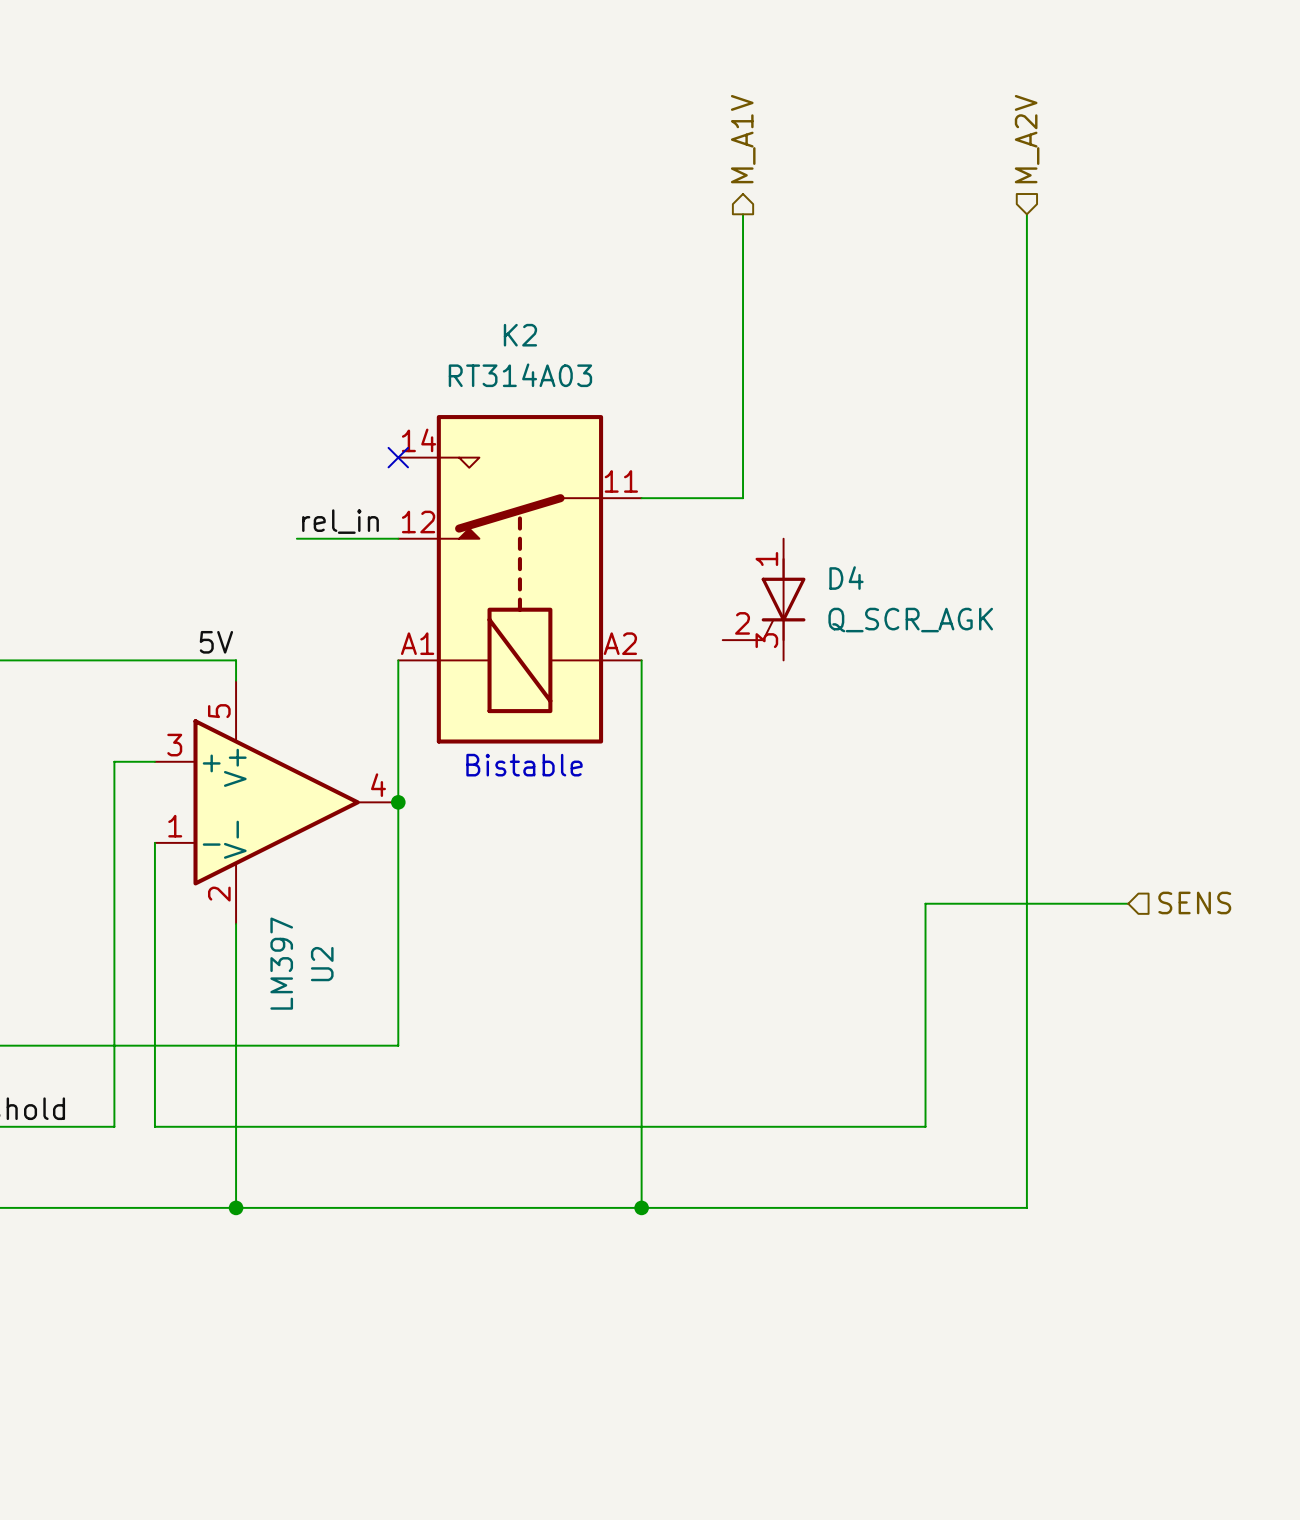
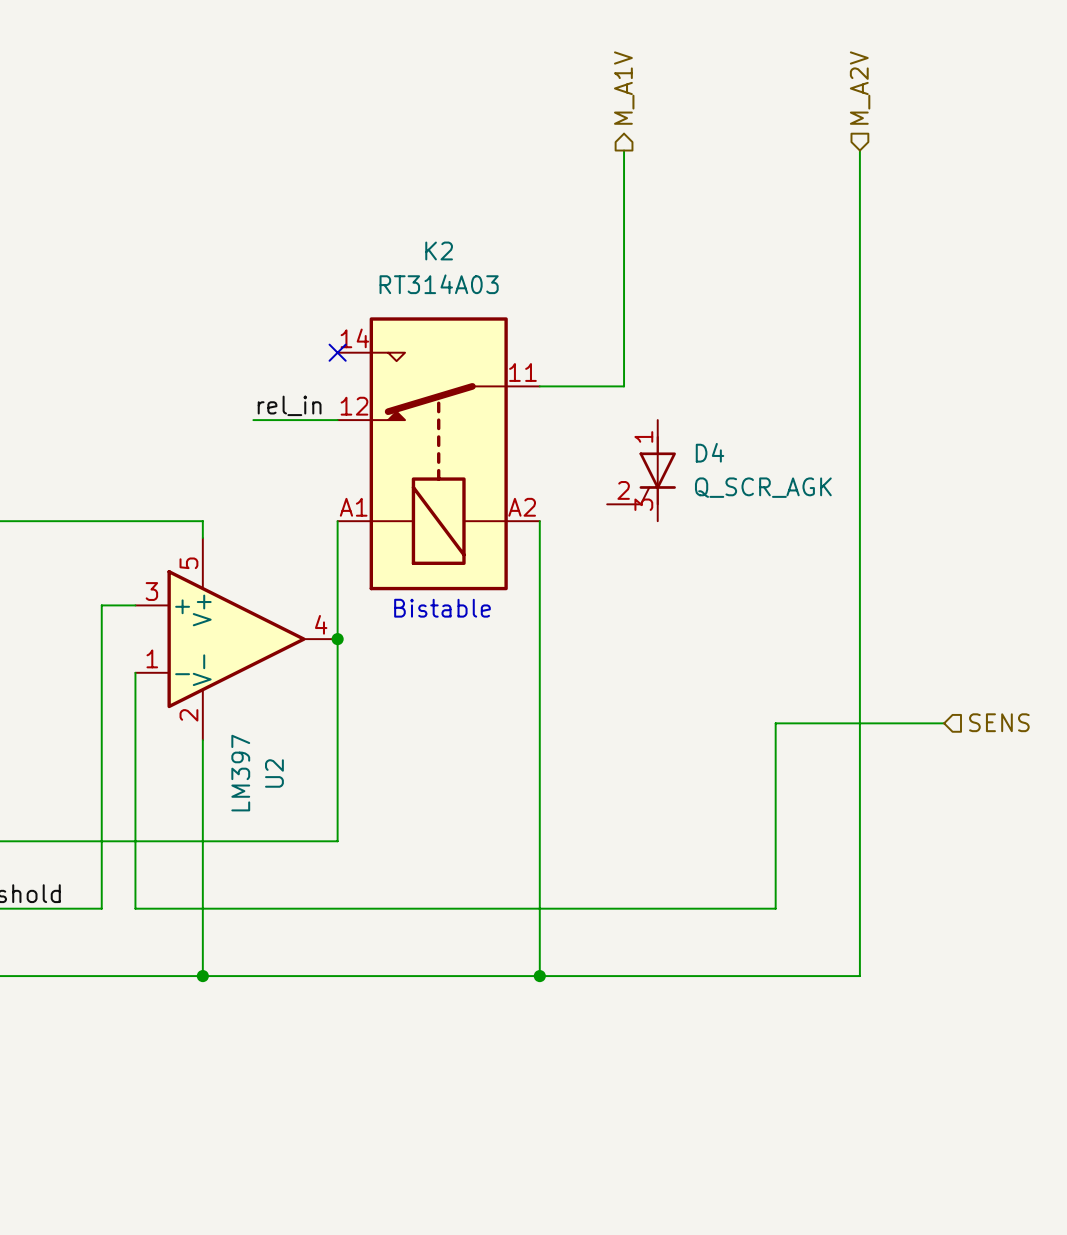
label: 5V (216, 642) -> none

